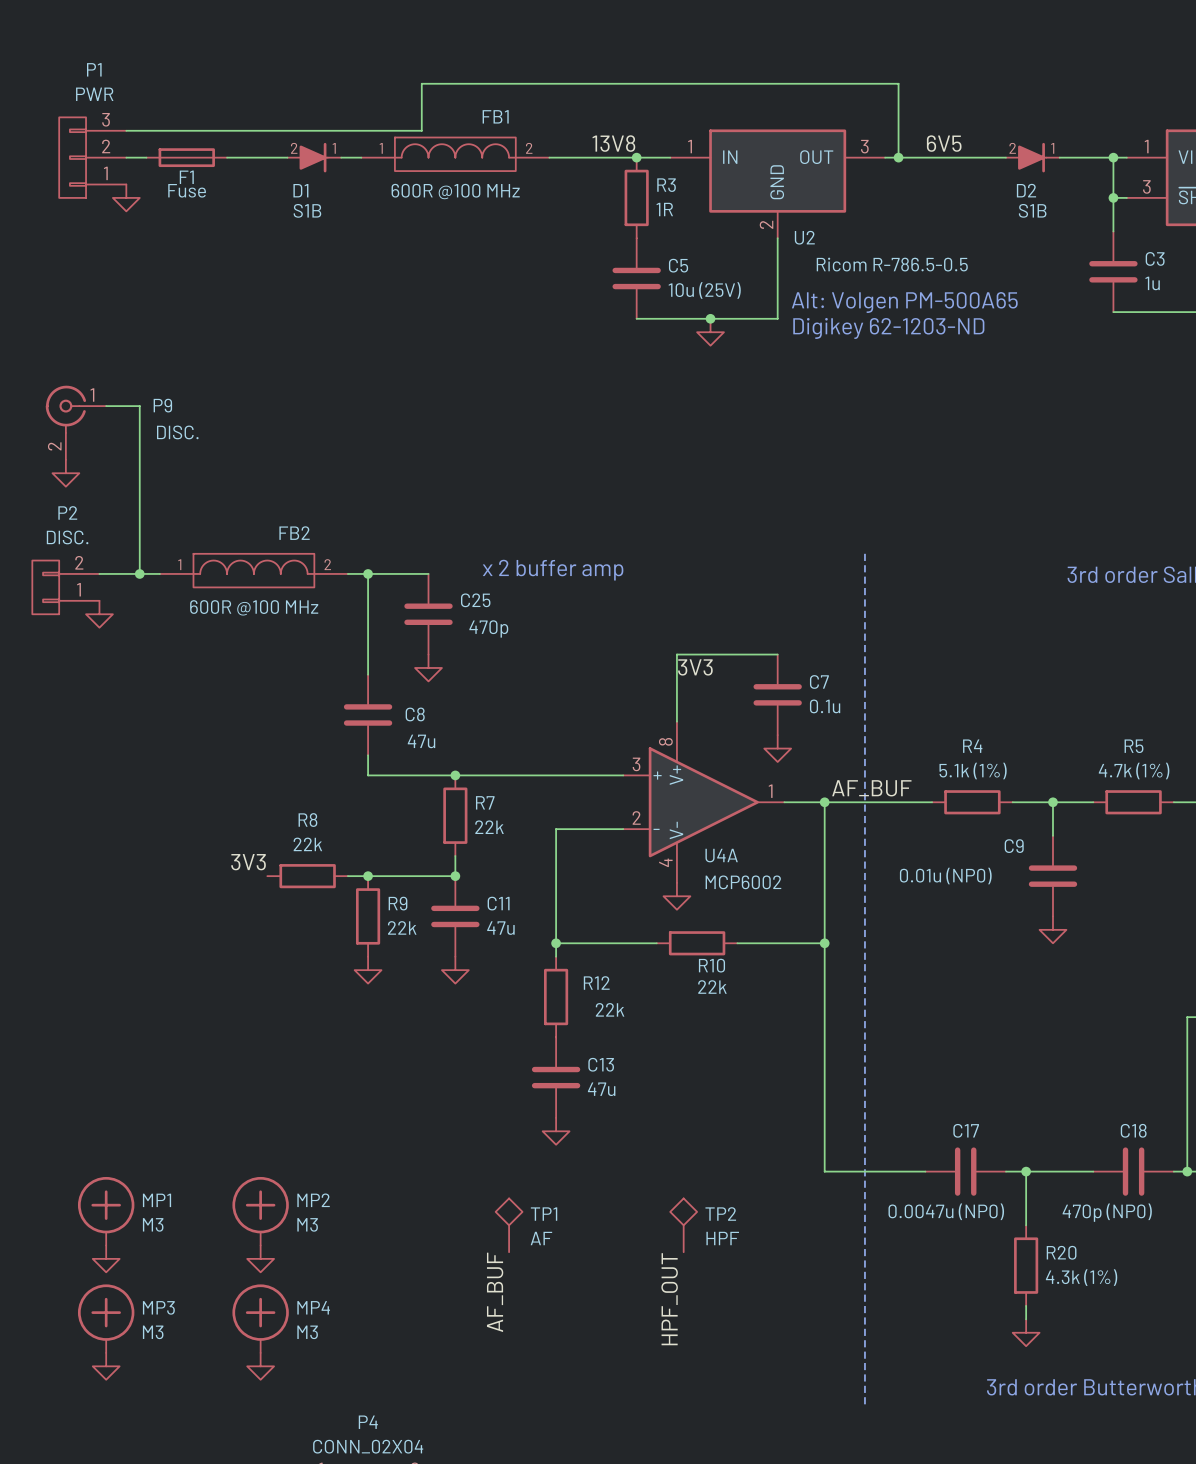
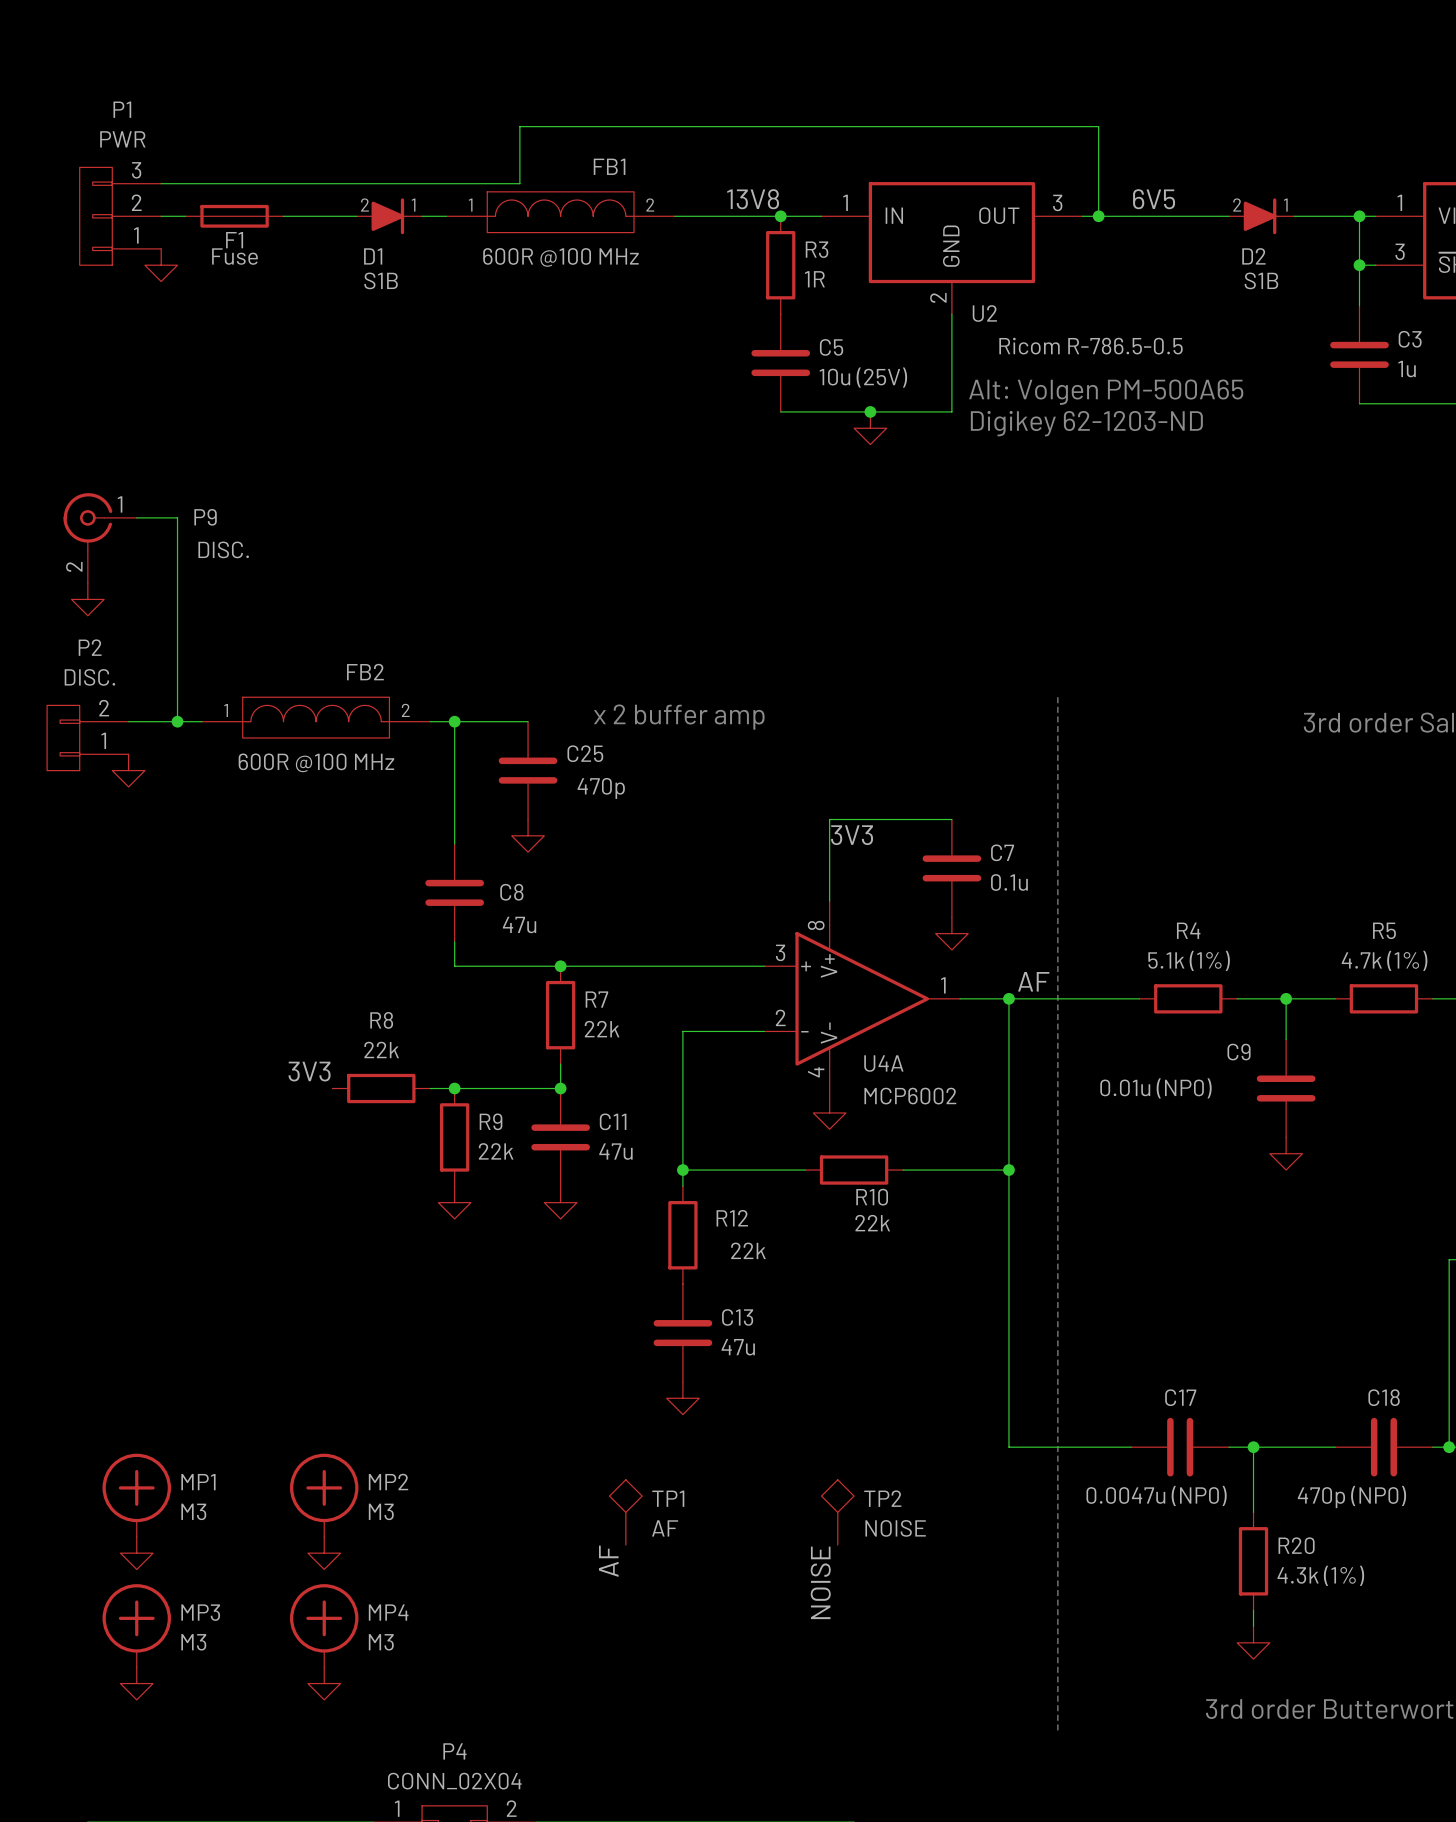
label: AF_BUF (871, 788) -> AF (1033, 981)
TP2 value: HPF (722, 1238) -> NOISE (895, 1528)
label: AF_BUF (495, 1292) -> AF (608, 1561)
label: HPF_OUT (669, 1299) -> NOISE (820, 1582)

